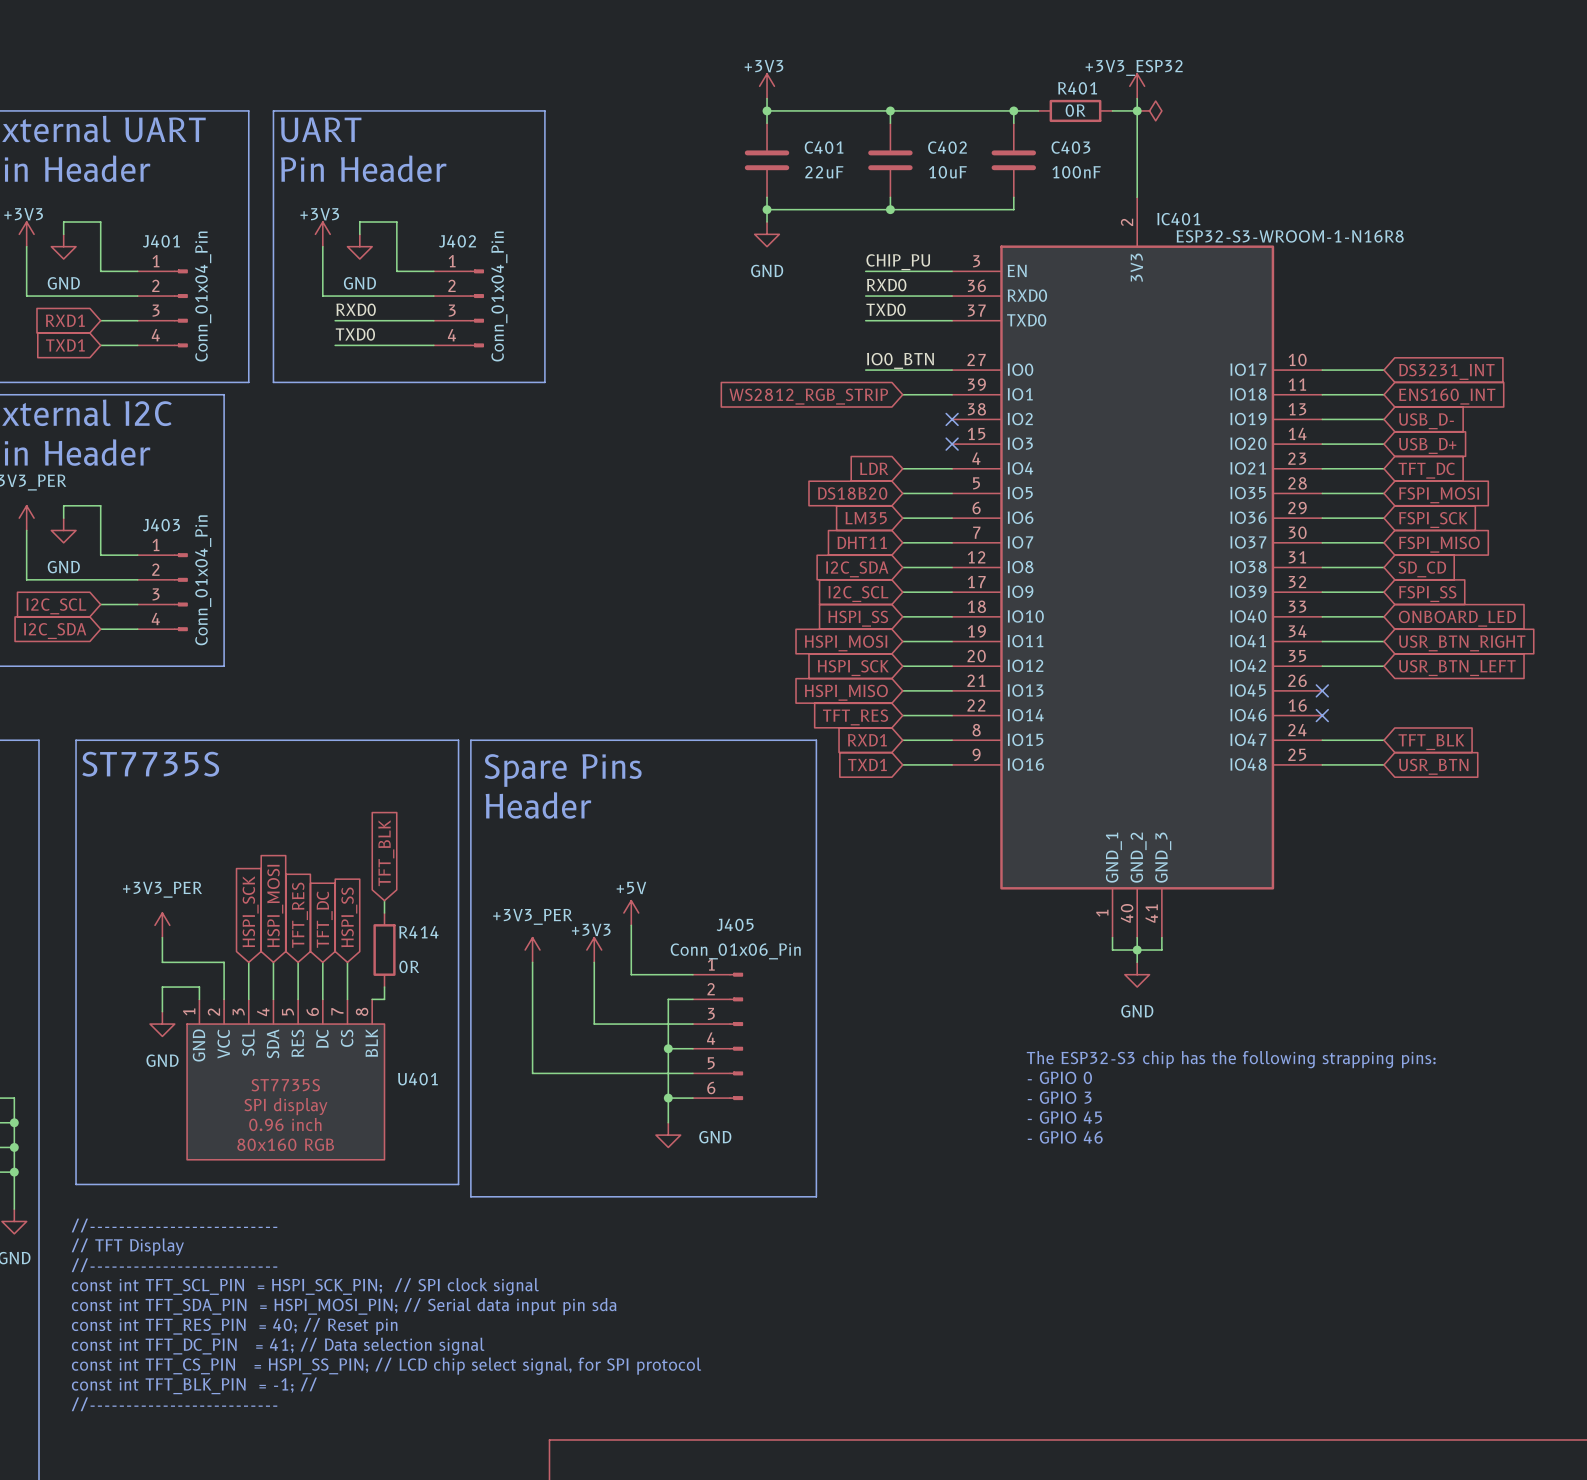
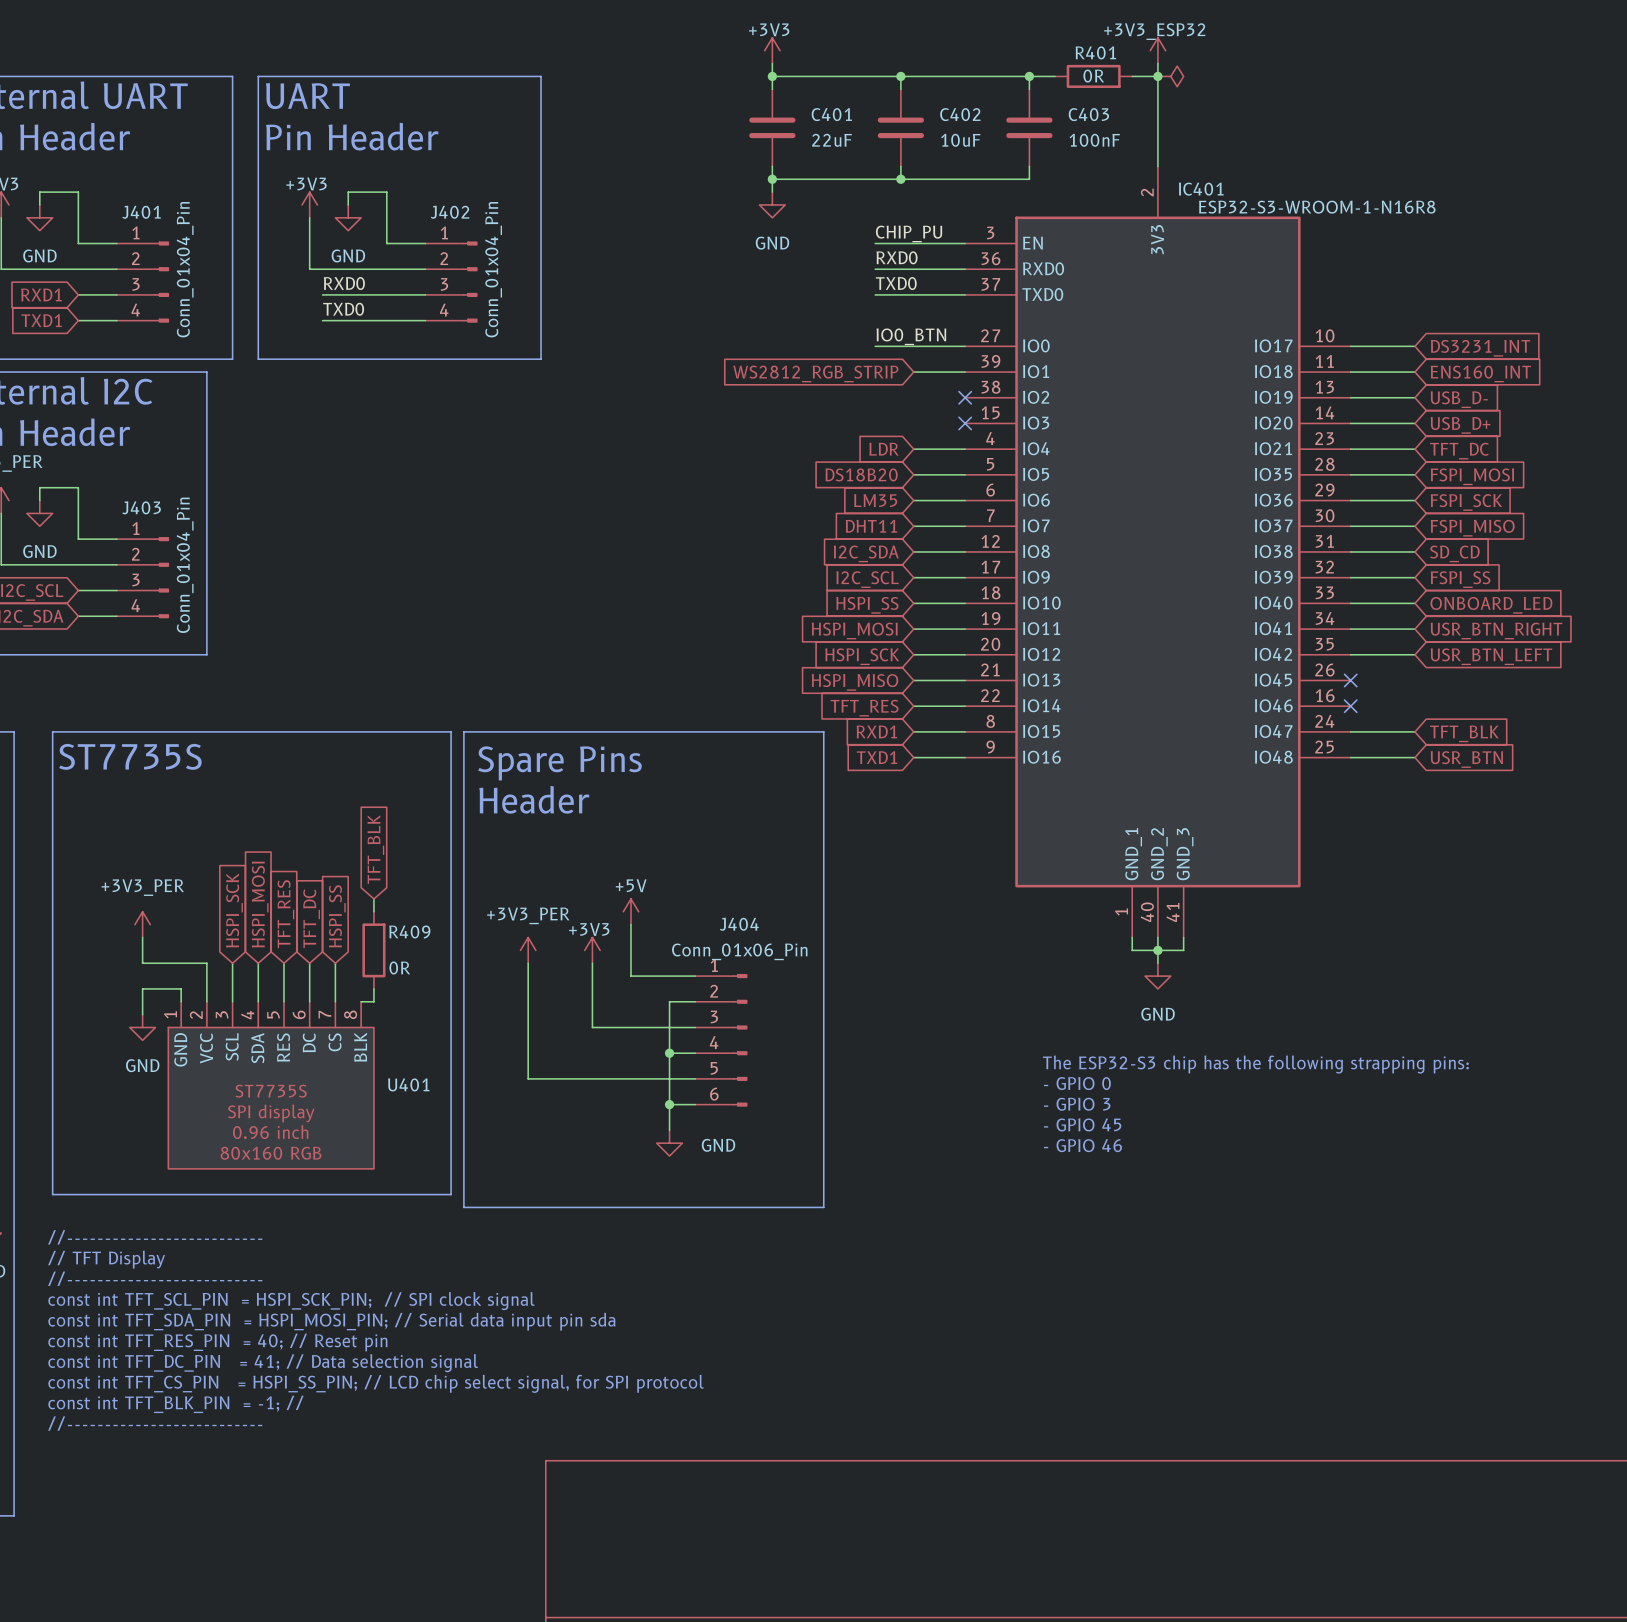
J405 name: J405 (735, 924) -> J404 (739, 924)
R414 name: R414 (418, 932) -> R409 (409, 931)

